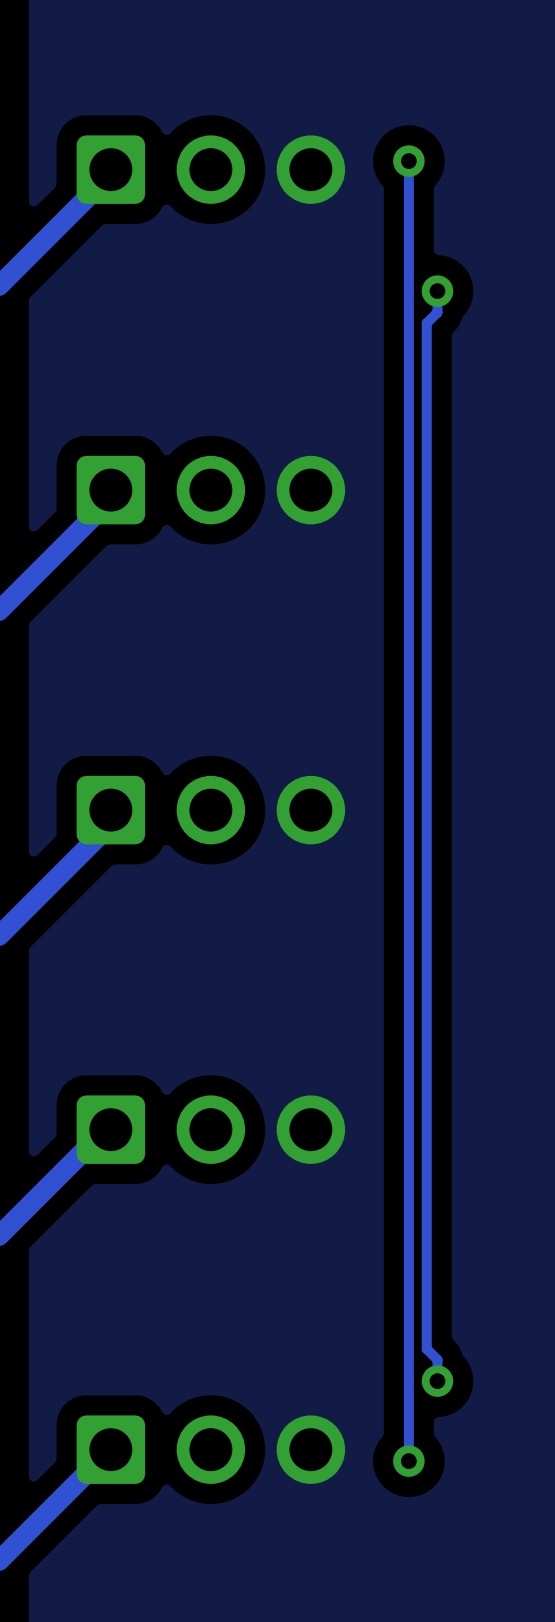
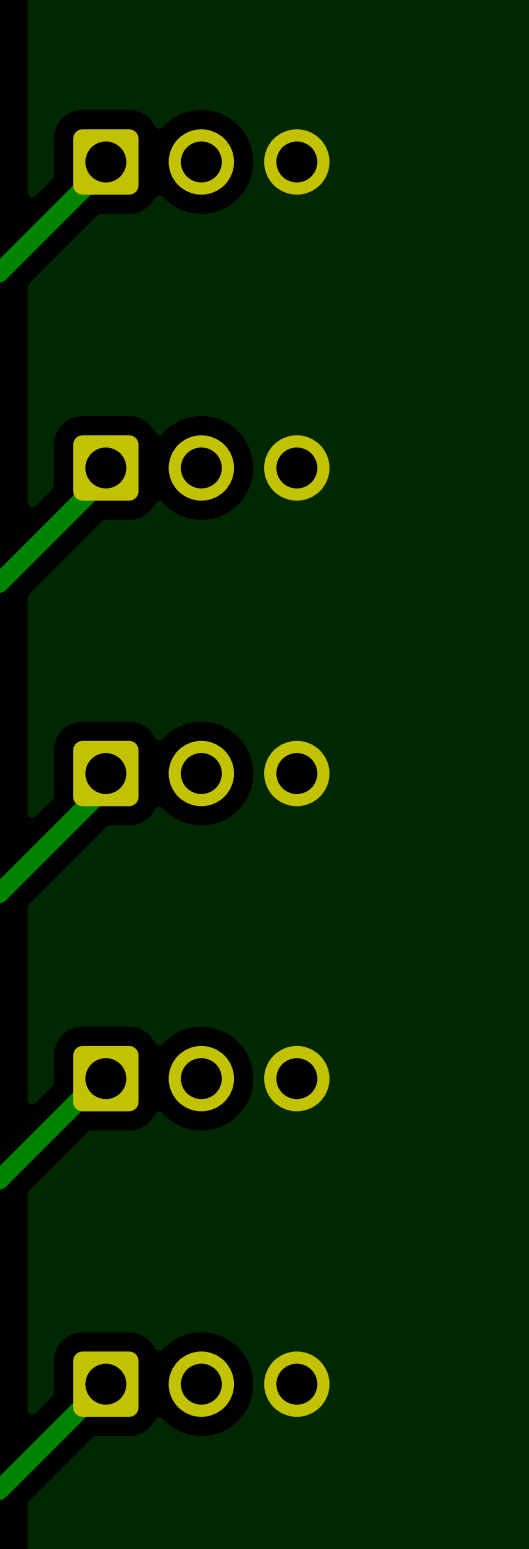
track: (408, 161) (408, 1461) -> none
via: (408, 161) -> none
track: (437, 291) (437, 312) (426, 323) (426, 1349) (437, 1359) (437, 1381) -> none
via: (437, 291) -> none
via: (437, 1381) -> none
via: (408, 1461) -> none

